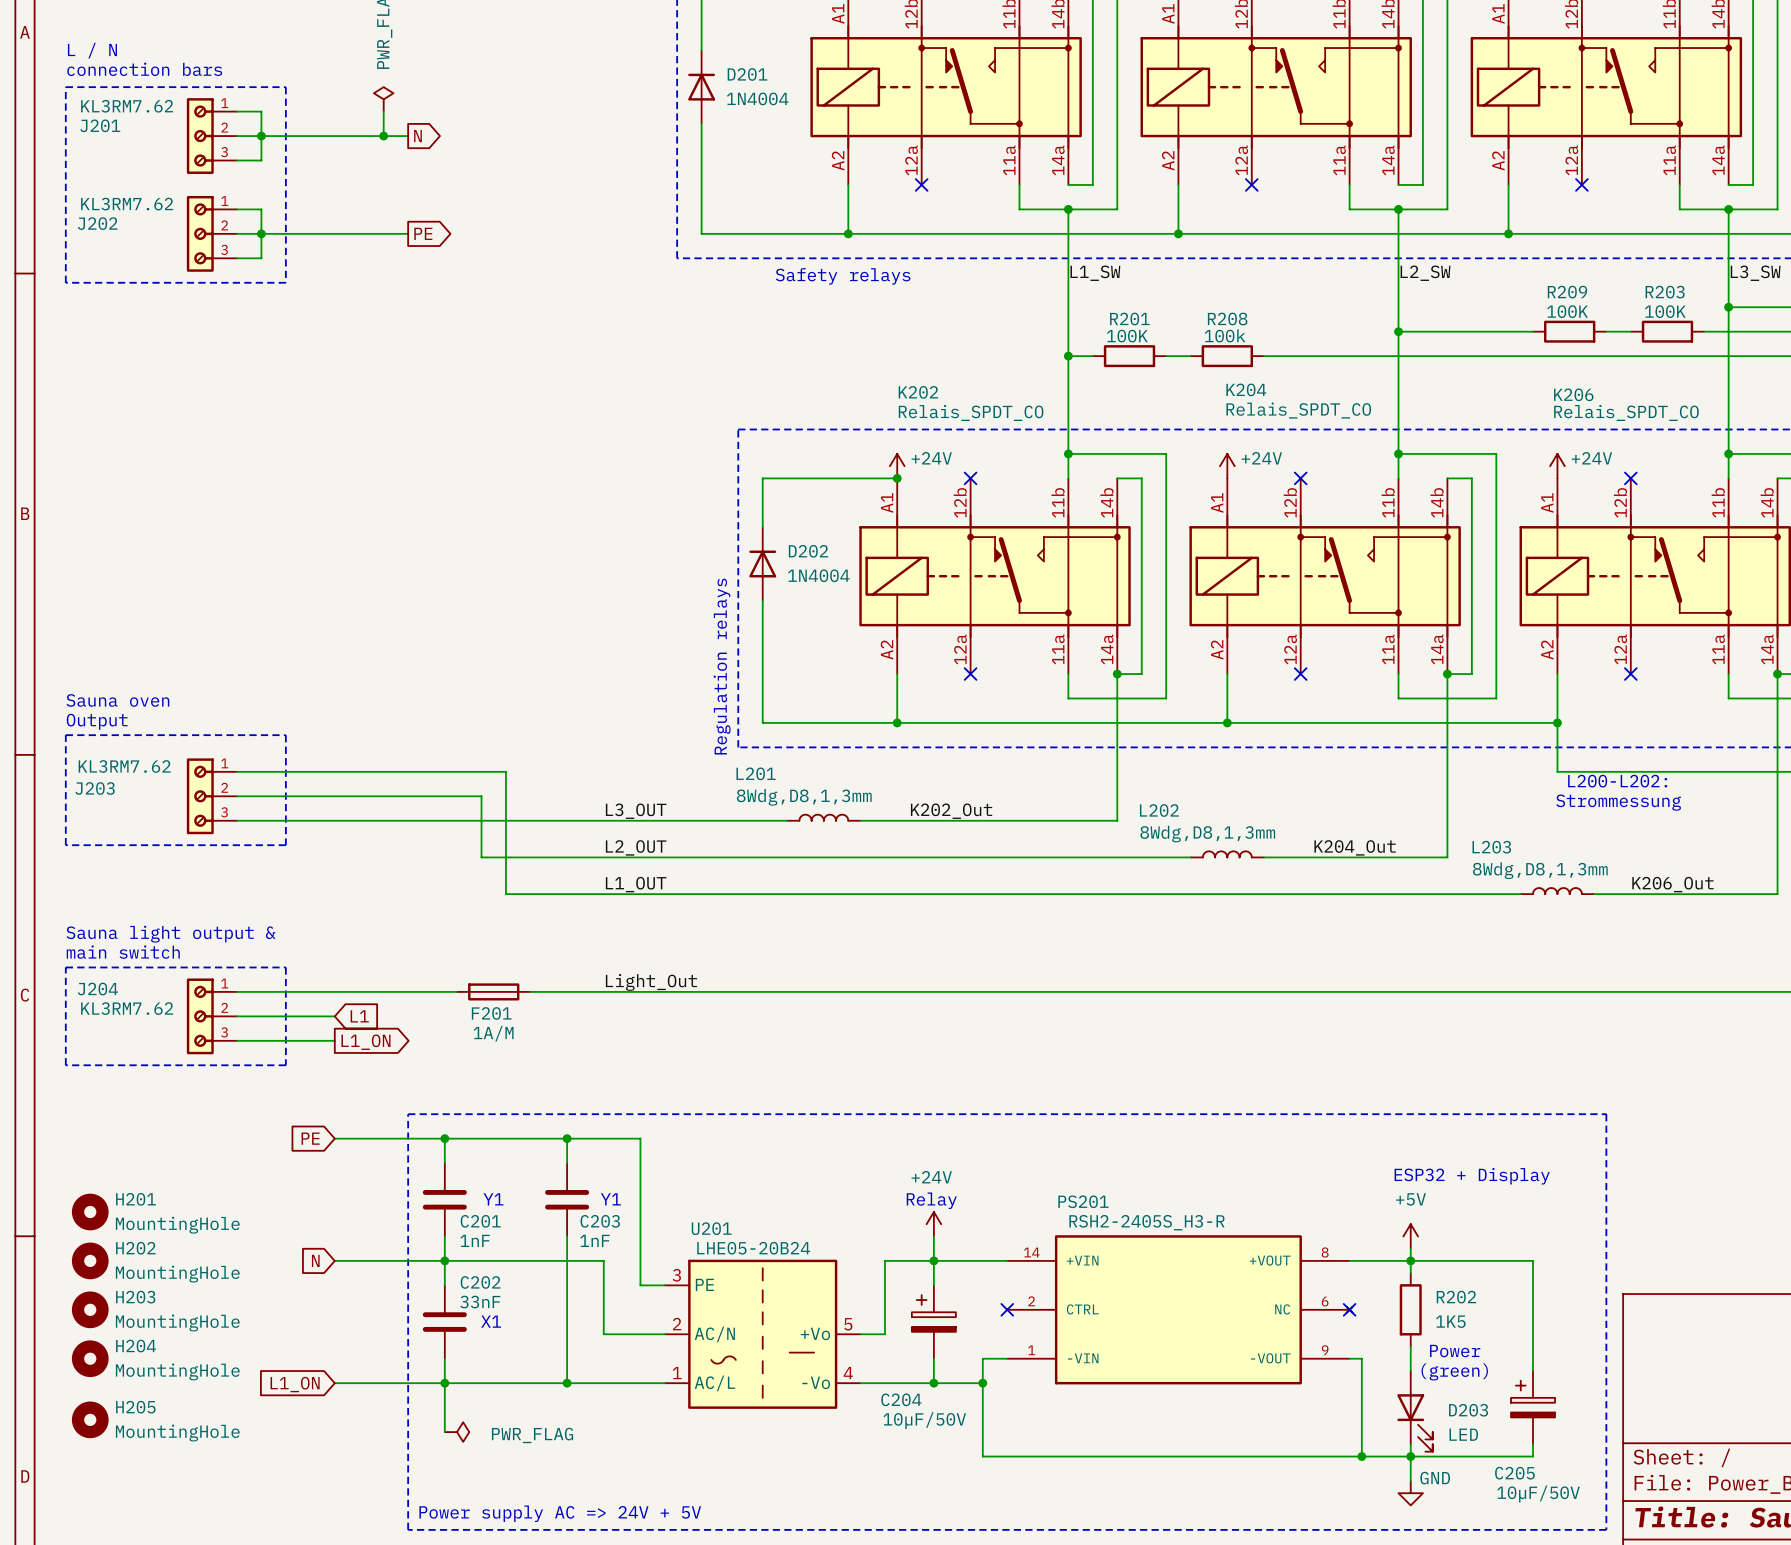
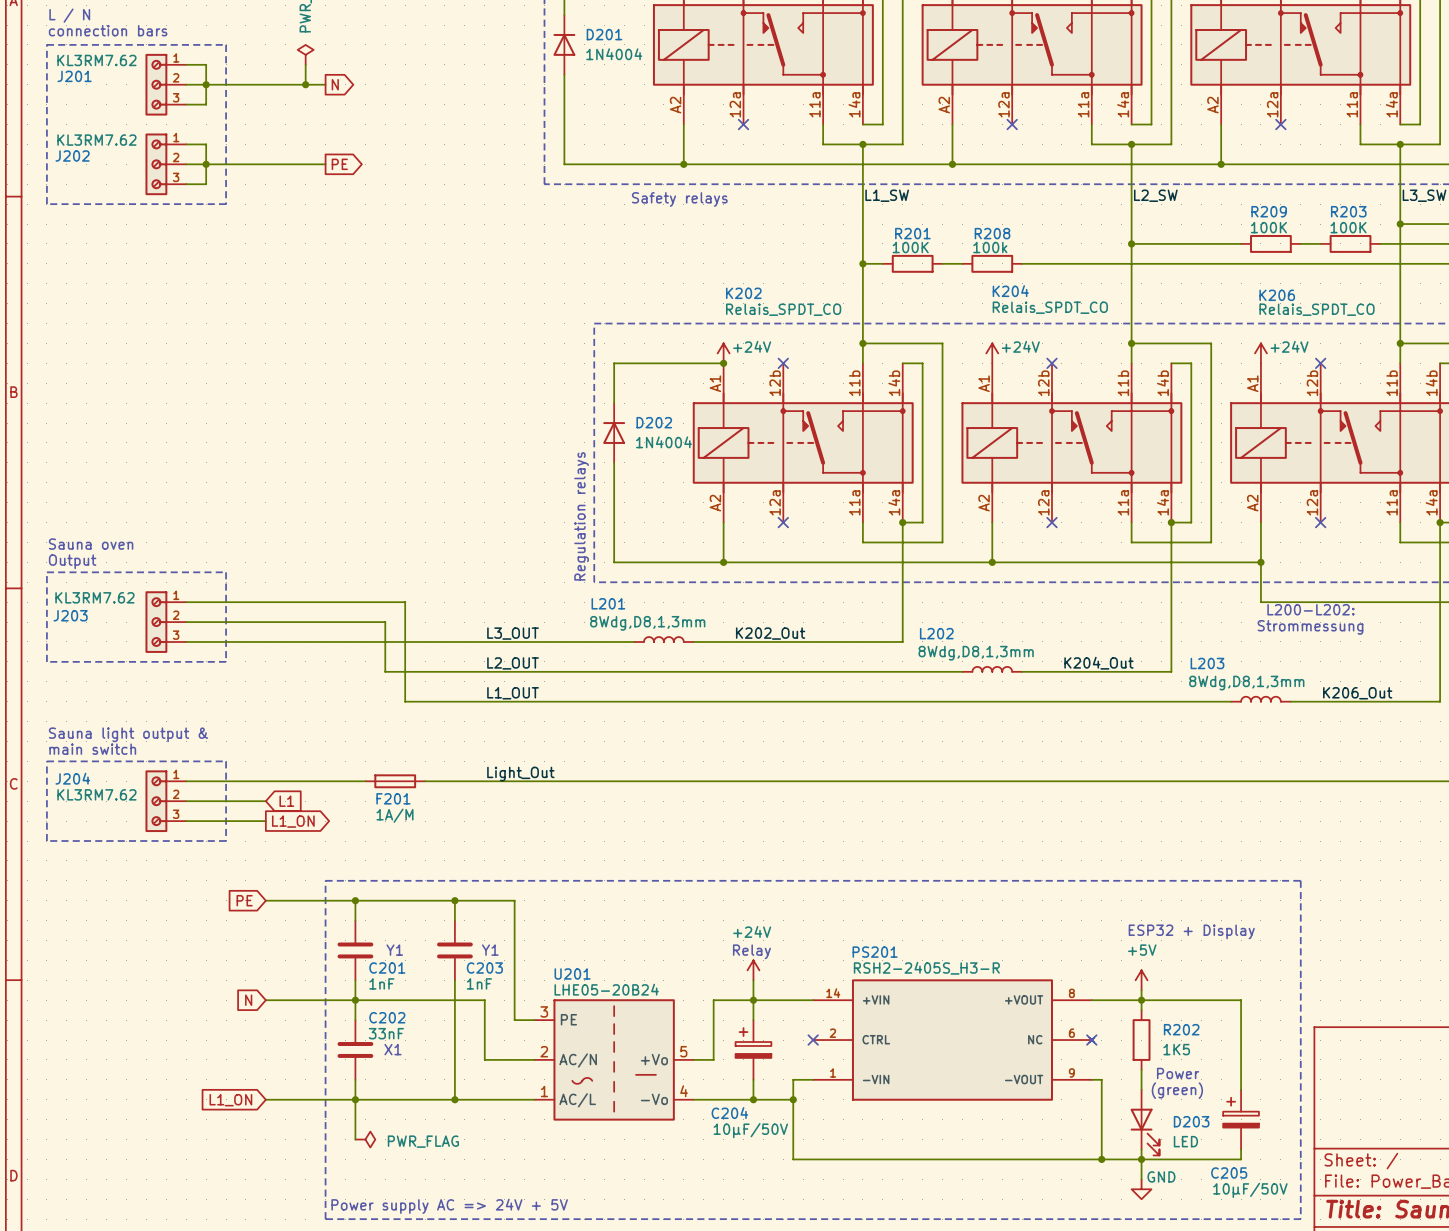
H201: MountingHole (90, 1212) -> none
H202: MountingHole (90, 1260) -> none
H203: MountingHole (90, 1309) -> none
H204: MountingHole (90, 1358) -> none
H205: MountingHole (90, 1419) -> none

